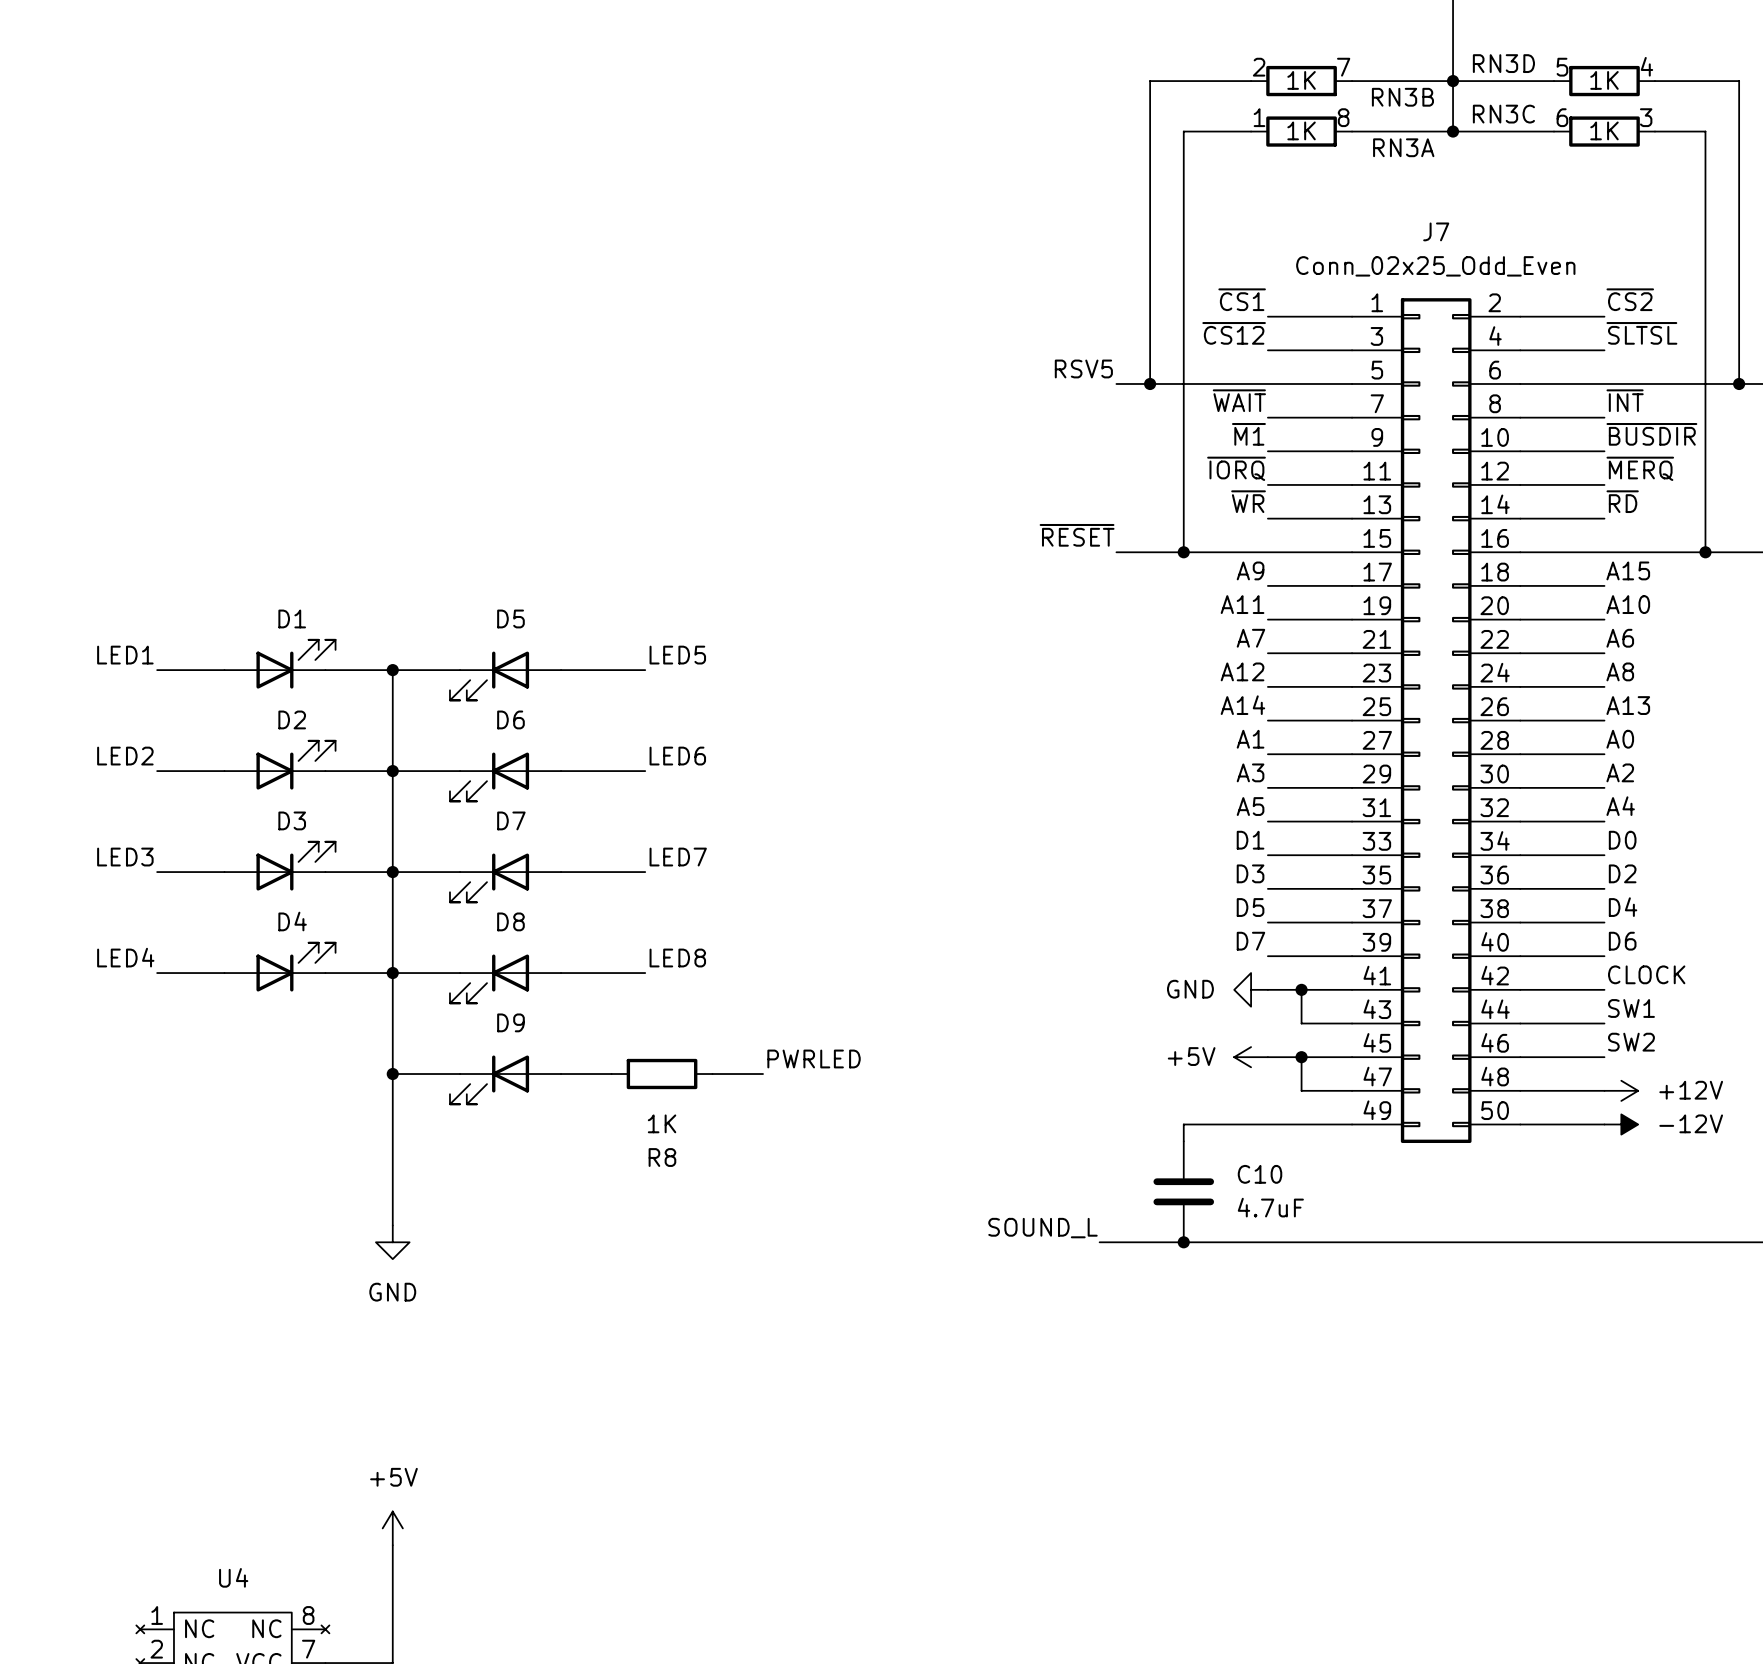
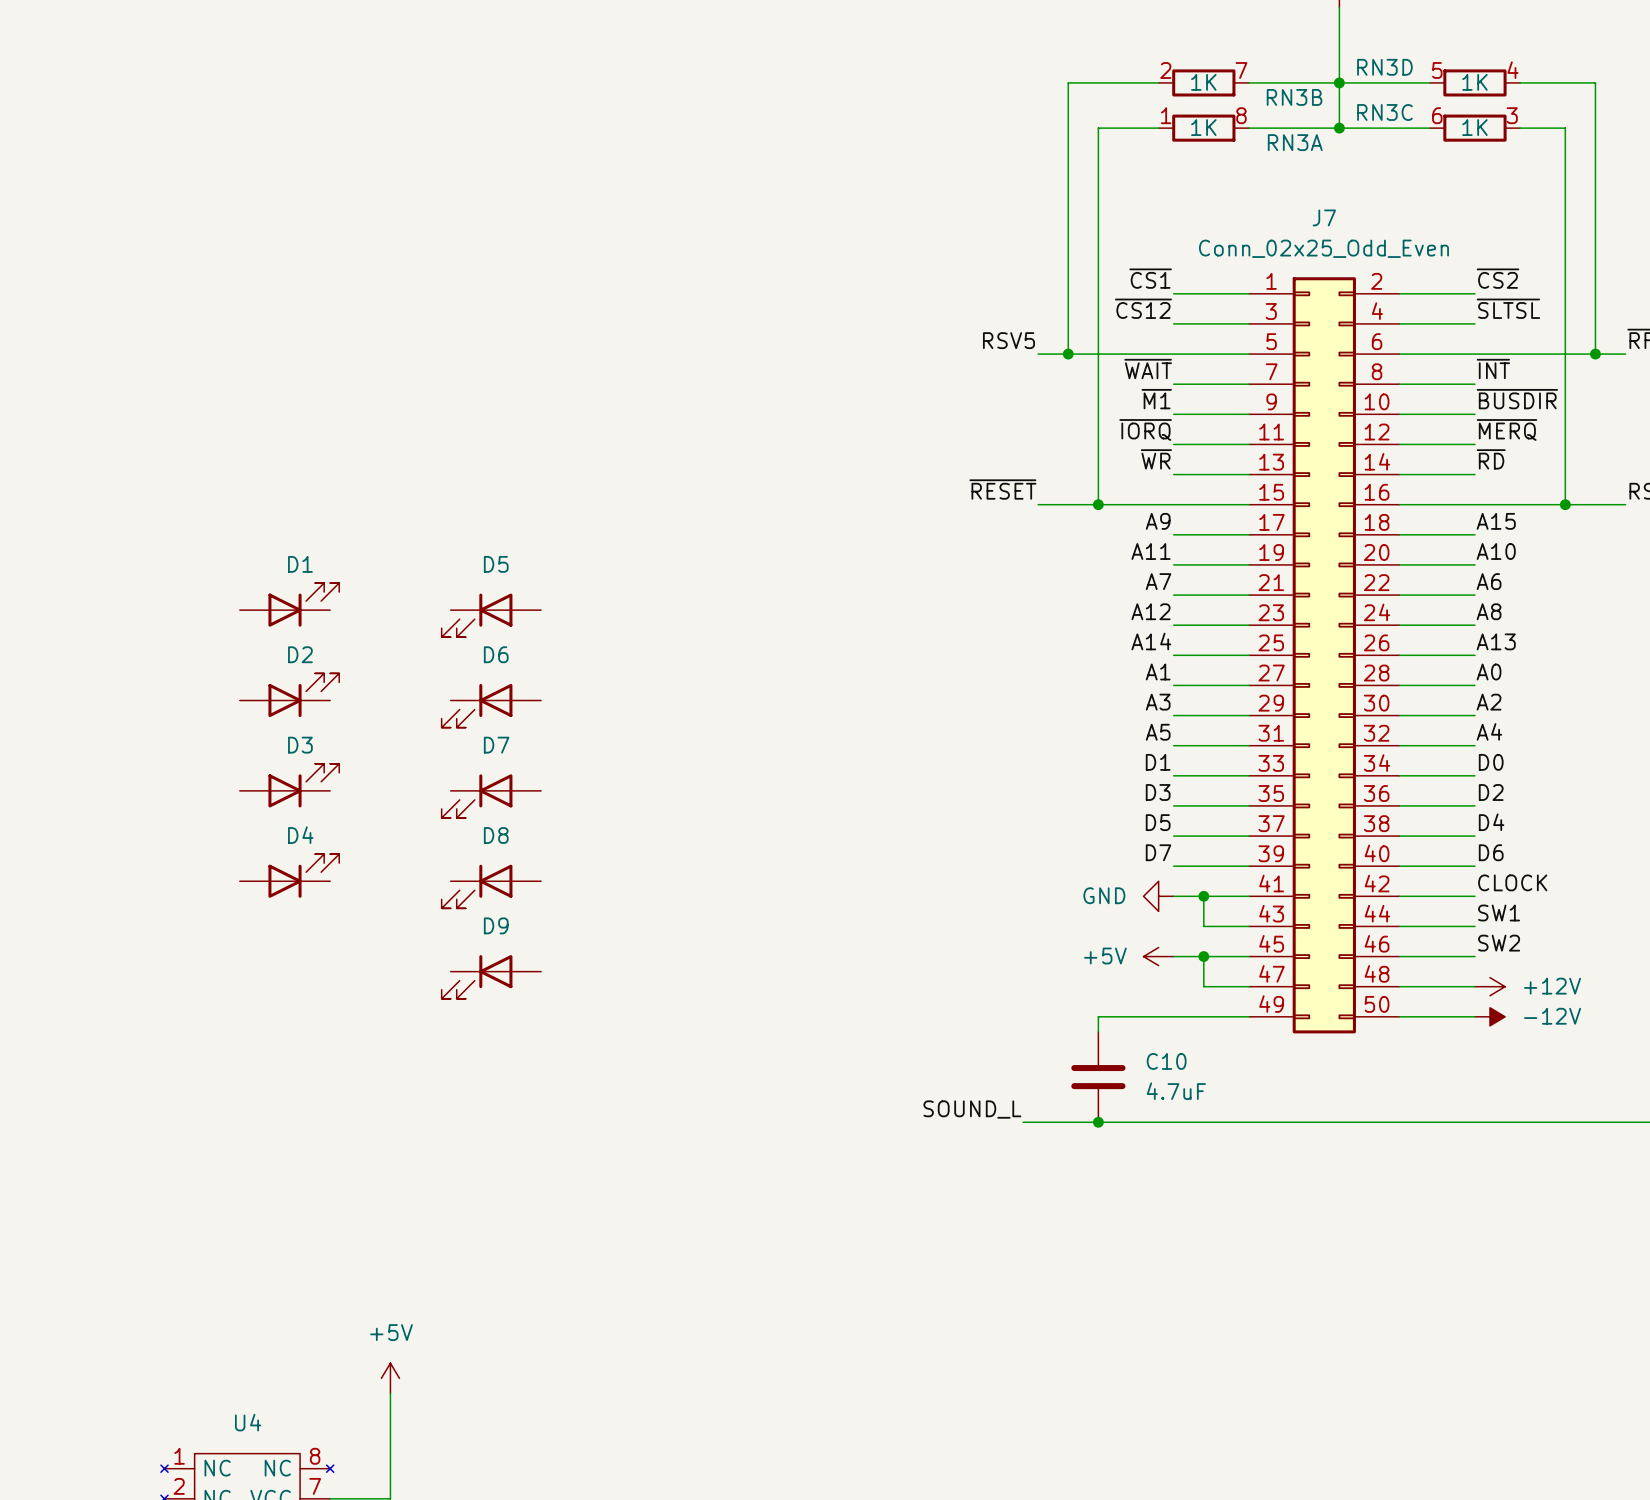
label: LED1 (125, 655) -> none
label: LED5 (677, 655) -> none
wire: (157, 670) (224, 670) -> none
wire: (325, 670) (460, 670) -> none
wire: (392, 670) (392, 1225) -> none
junction: (392, 670) -> none
wire: (561, 670) (645, 670) -> none
label: LED2 (125, 756) -> none
label: LED6 (677, 756) -> none
wire: (157, 771) (224, 771) -> none
wire: (325, 771) (460, 771) -> none
junction: (392, 771) -> none
wire: (561, 771) (645, 771) -> none
label: LED3 (125, 857) -> none
label: LED7 (678, 857) -> none
wire: (157, 872) (224, 872) -> none
wire: (325, 872) (460, 872) -> none
junction: (392, 872) -> none
wire: (561, 872) (645, 872) -> none
label: LED4 (125, 957) -> none
label: LED8 (677, 958) -> none
wire: (157, 973) (224, 973) -> none
wire: (325, 973) (460, 973) -> none
junction: (392, 973) -> none
wire: (561, 973) (645, 973) -> none
label: PWRLED (814, 1058) -> none
wire: (392, 1074) (460, 1074) -> none
junction: (392, 1074) -> none
wire: (561, 1074) (611, 1074) -> none
R8: 1K (662, 1074) -> none
wire: (712, 1074) (763, 1074) -> none
power symbol: GND (392, 1242) -> none

